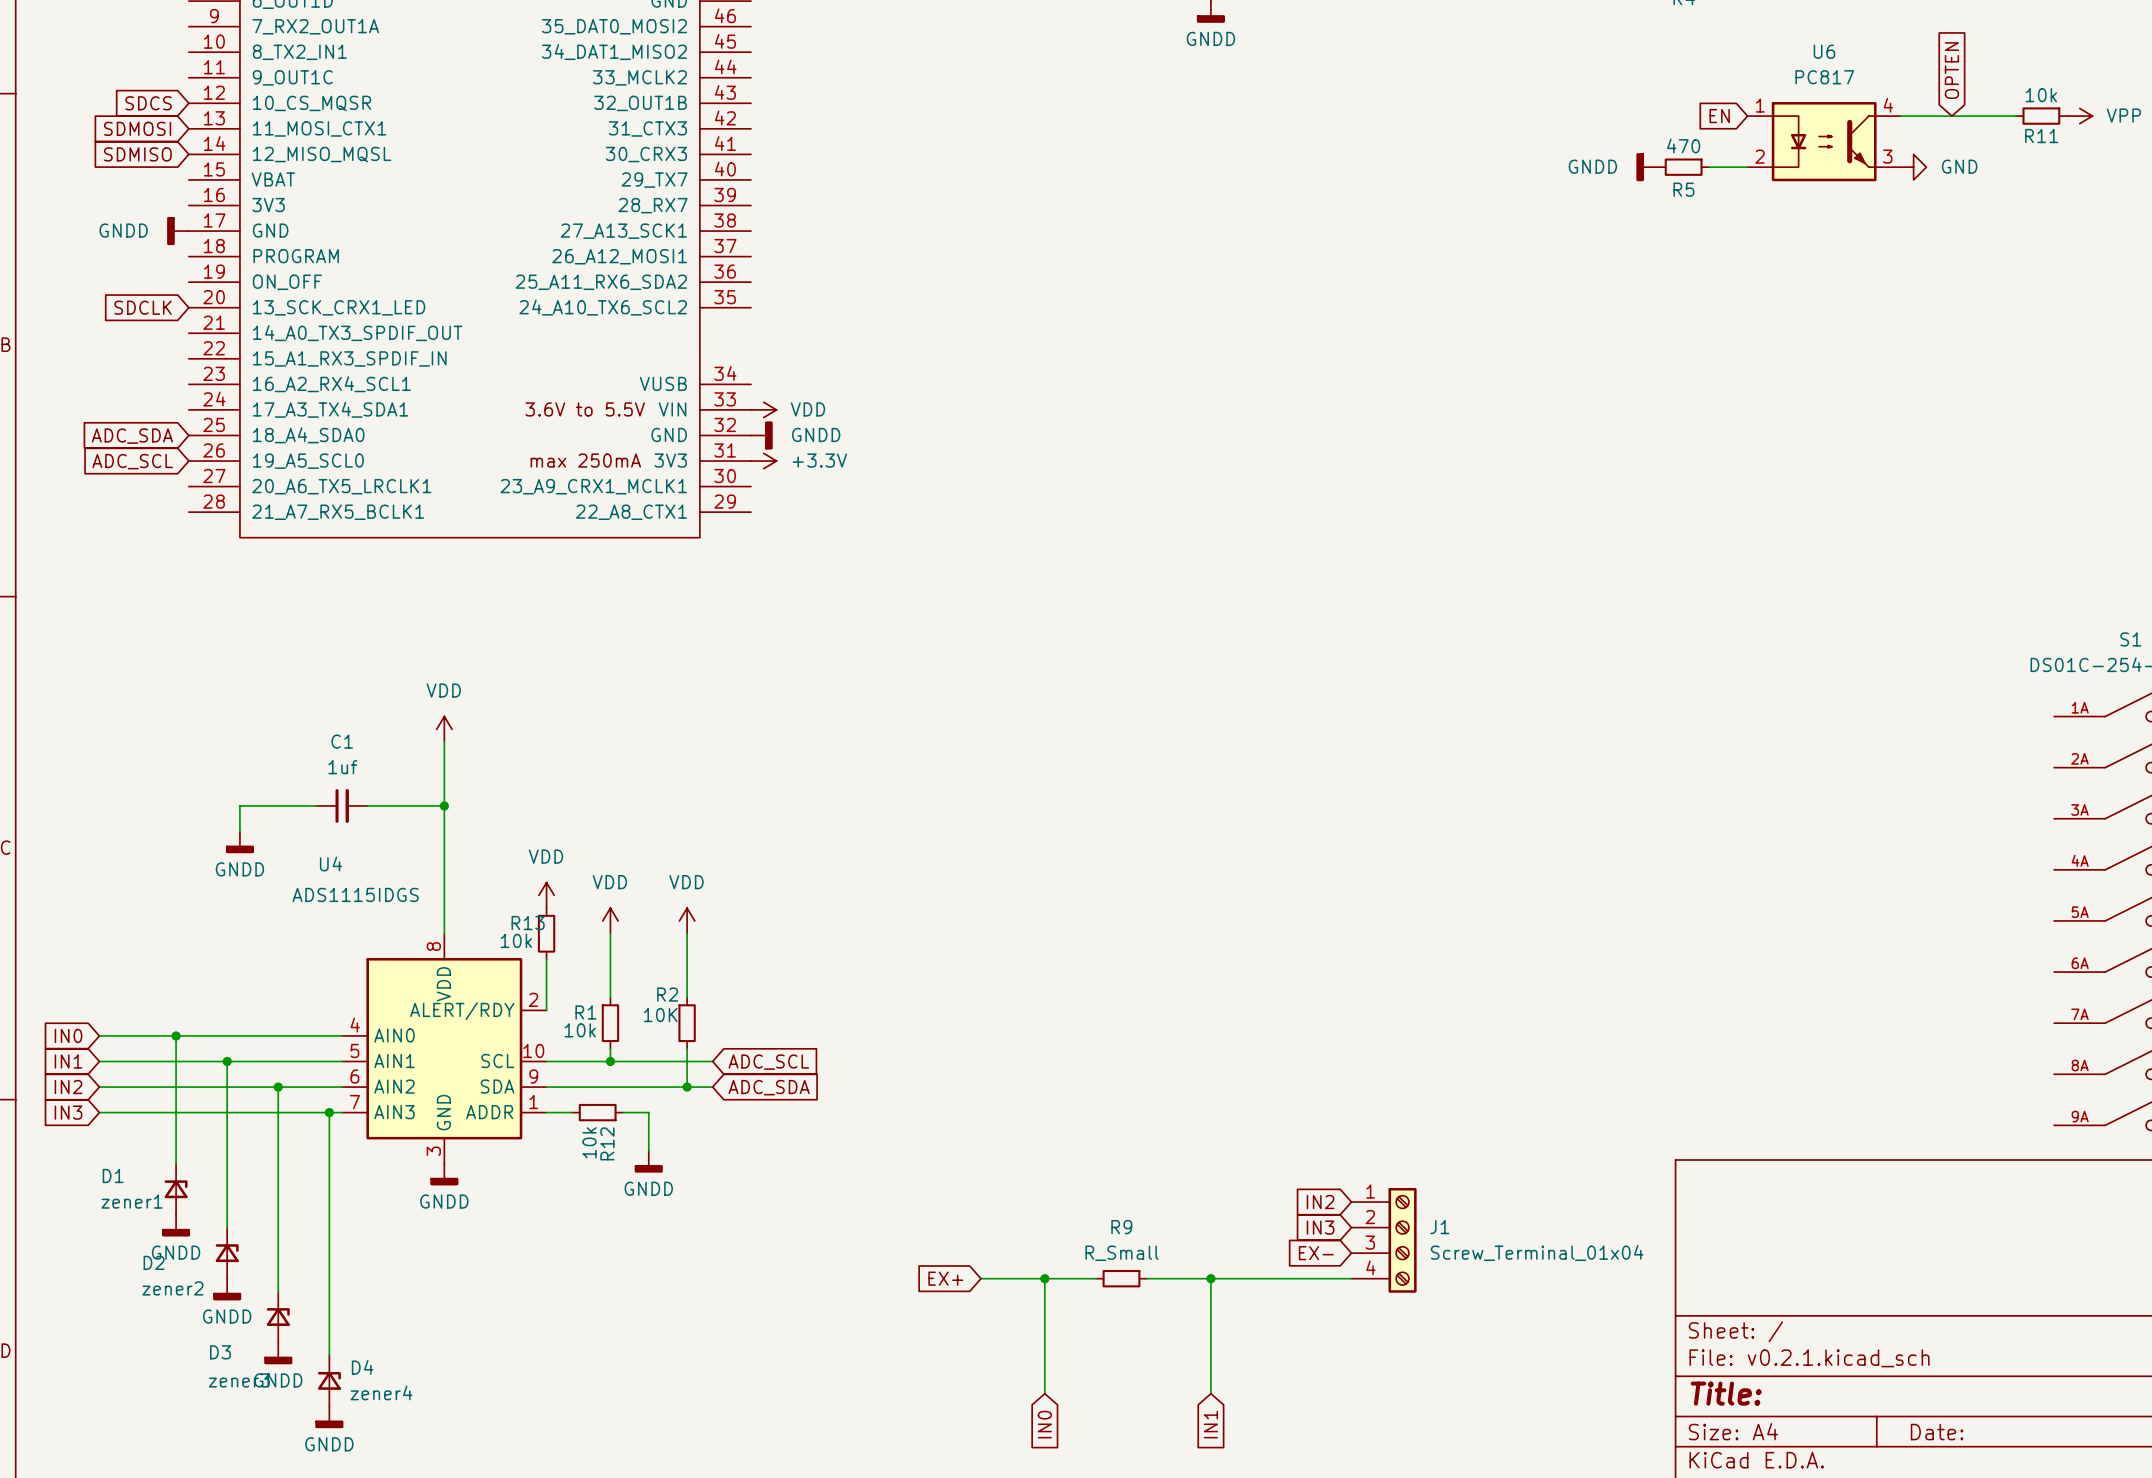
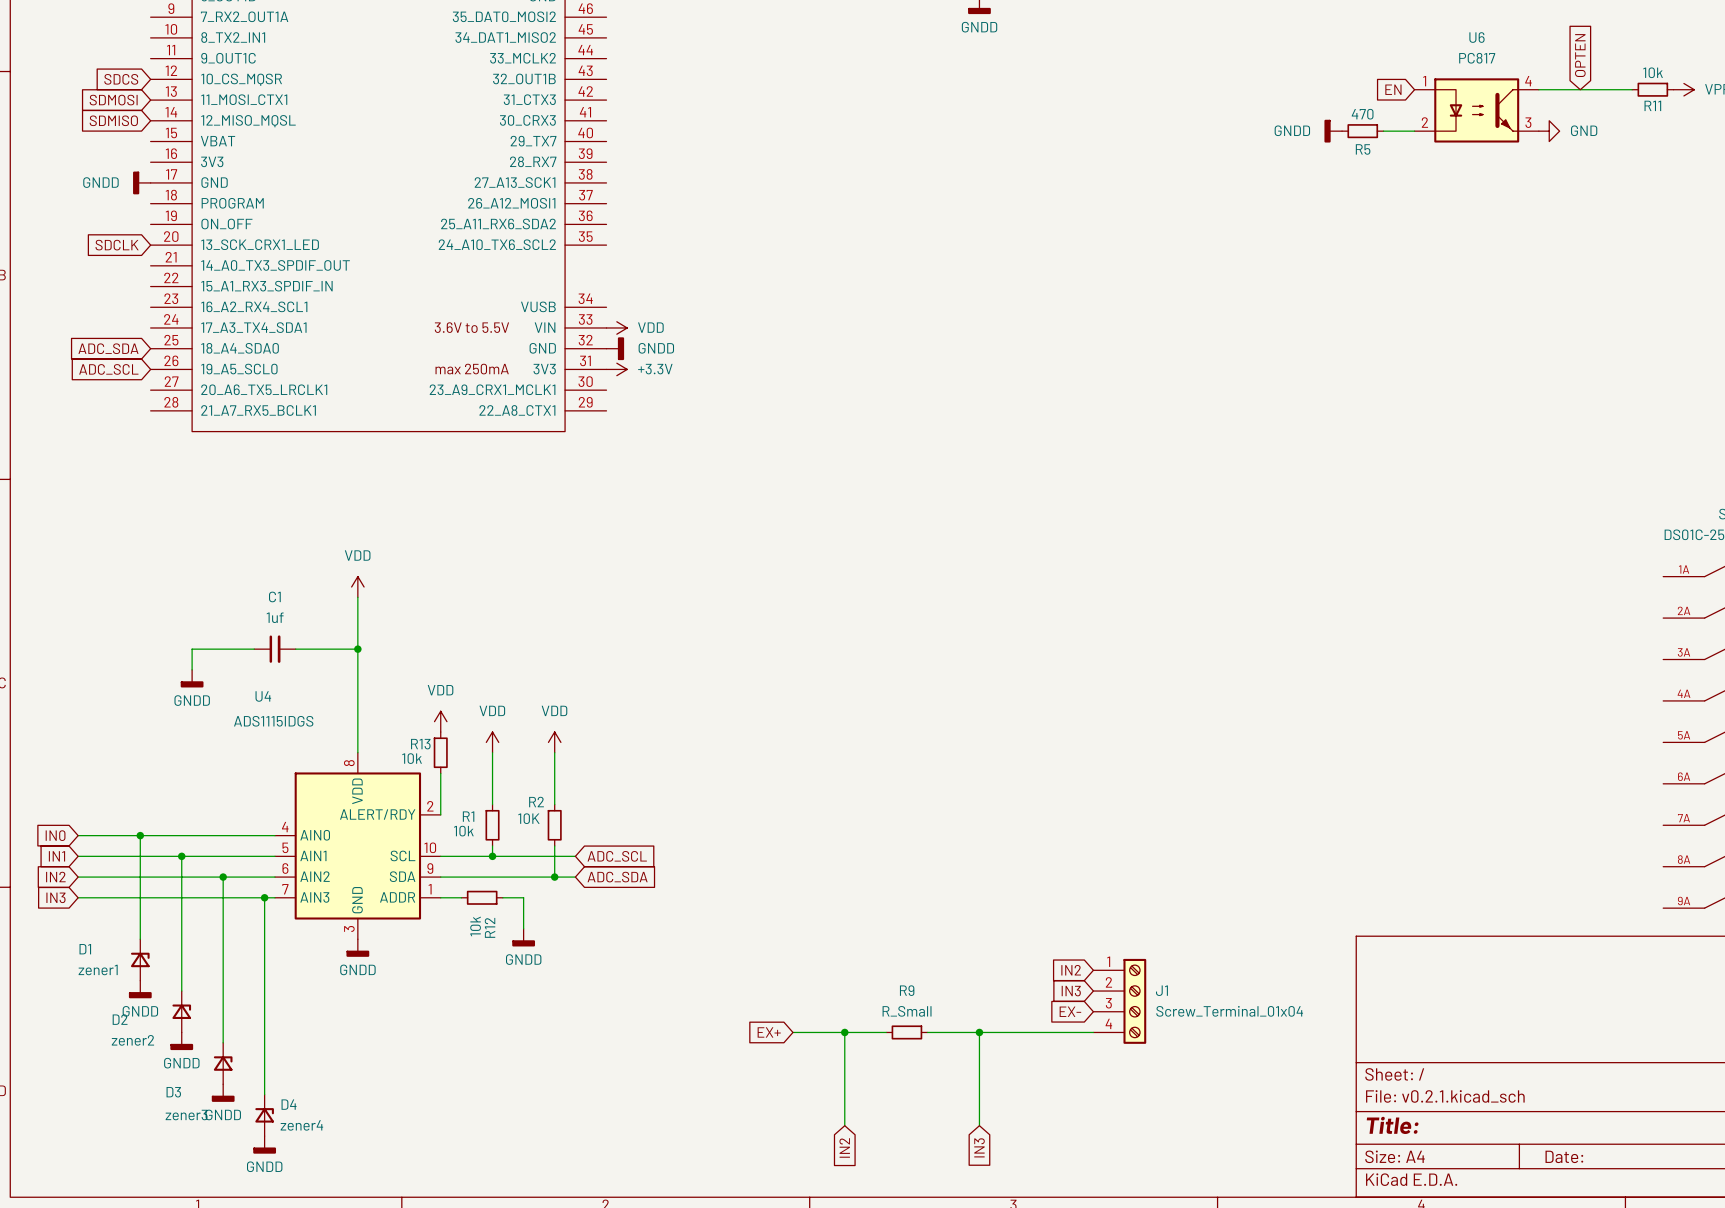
global label: IN0 (1044, 1424) -> IN2 (844, 1147)
global label: IN1 (1210, 1424) -> IN3 (979, 1147)

